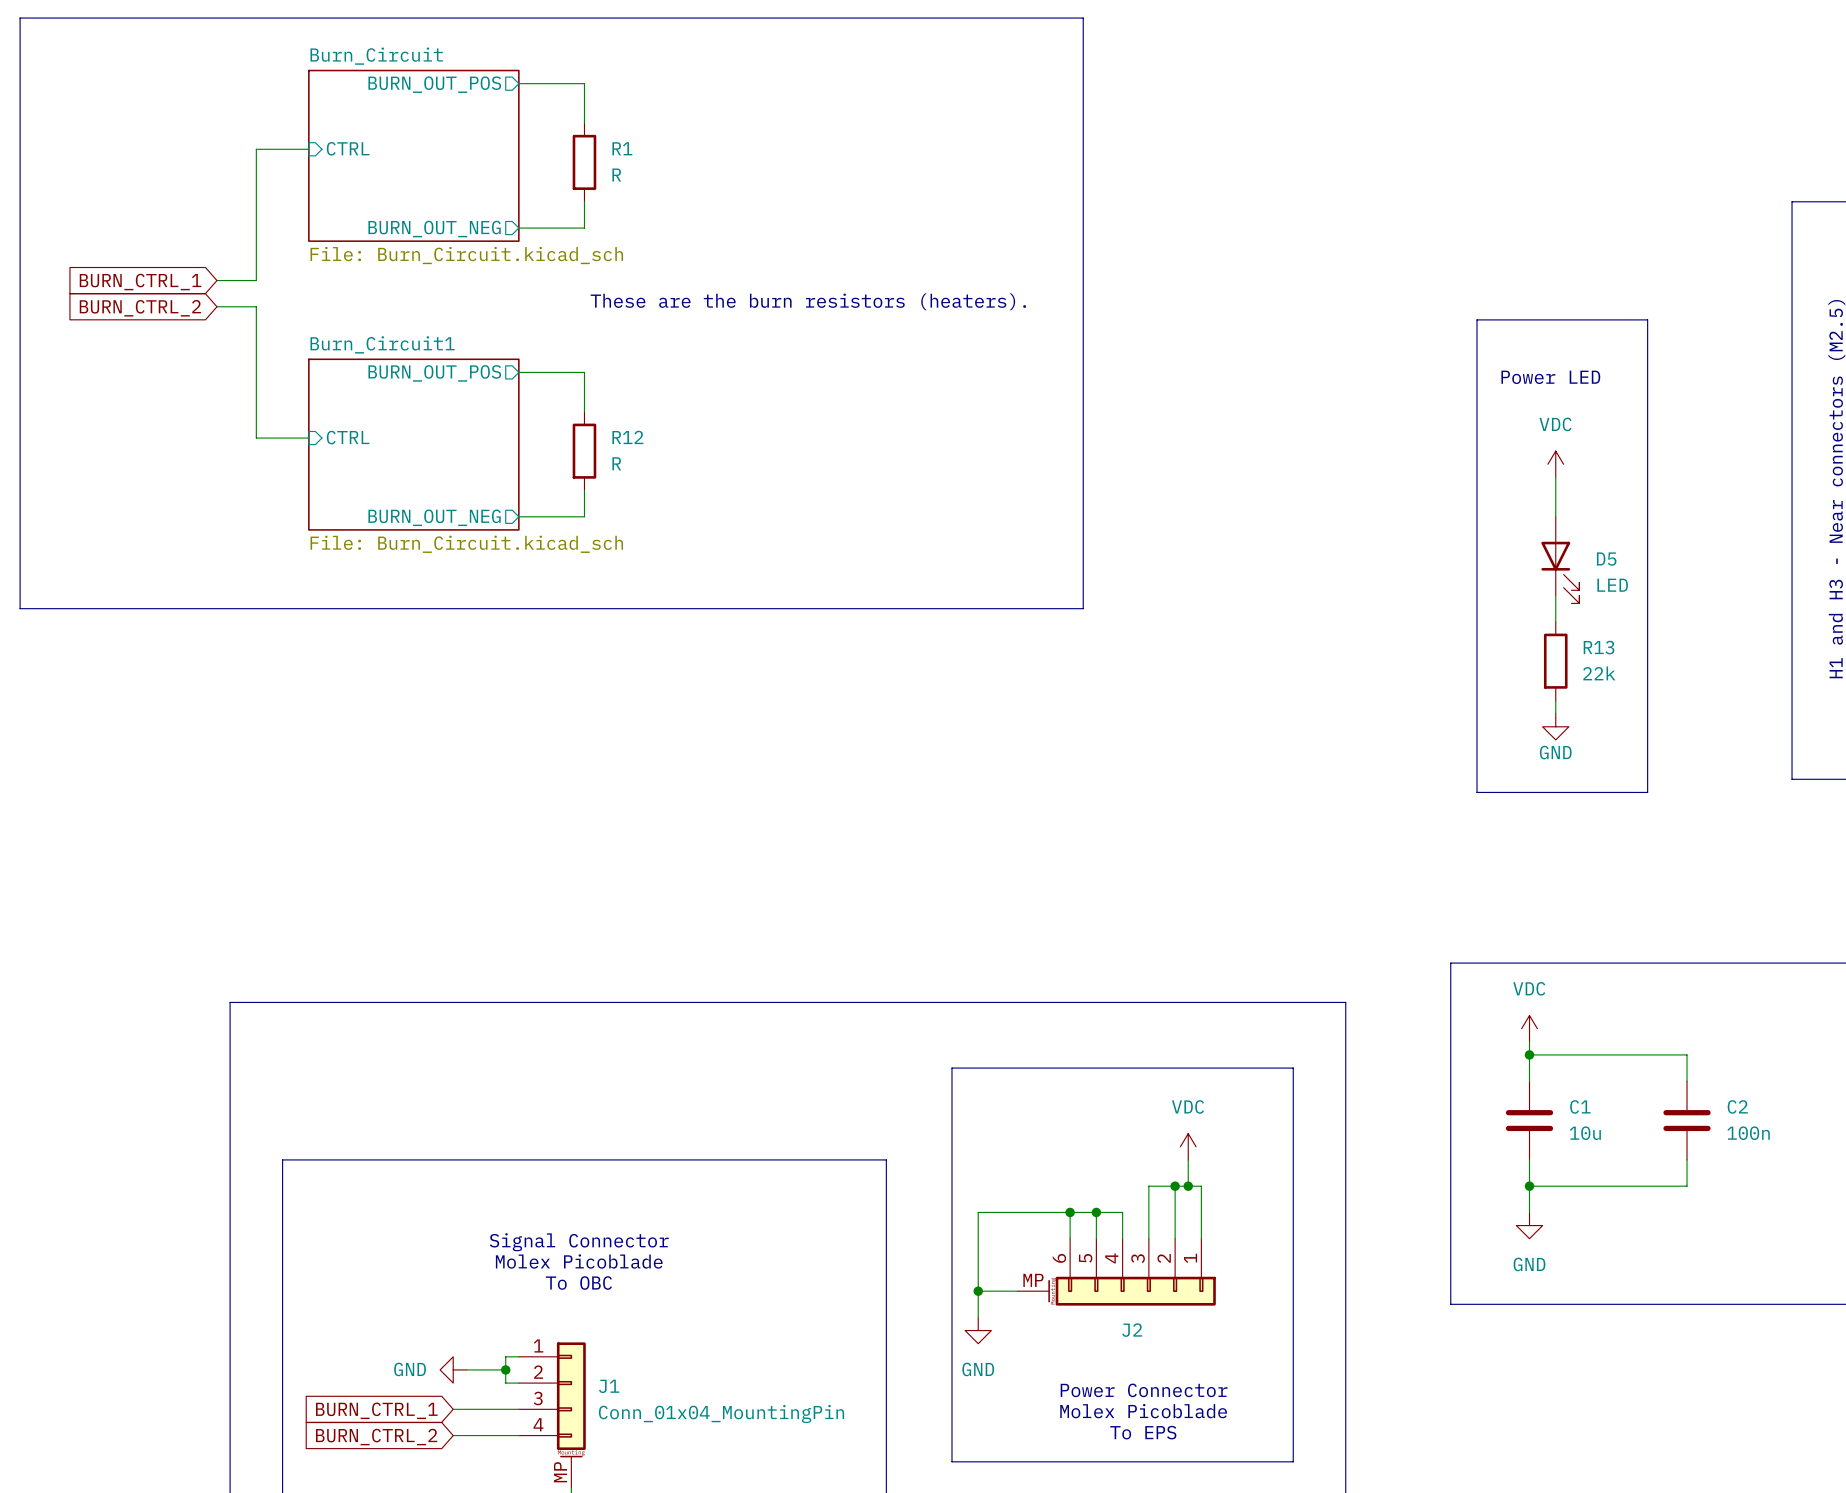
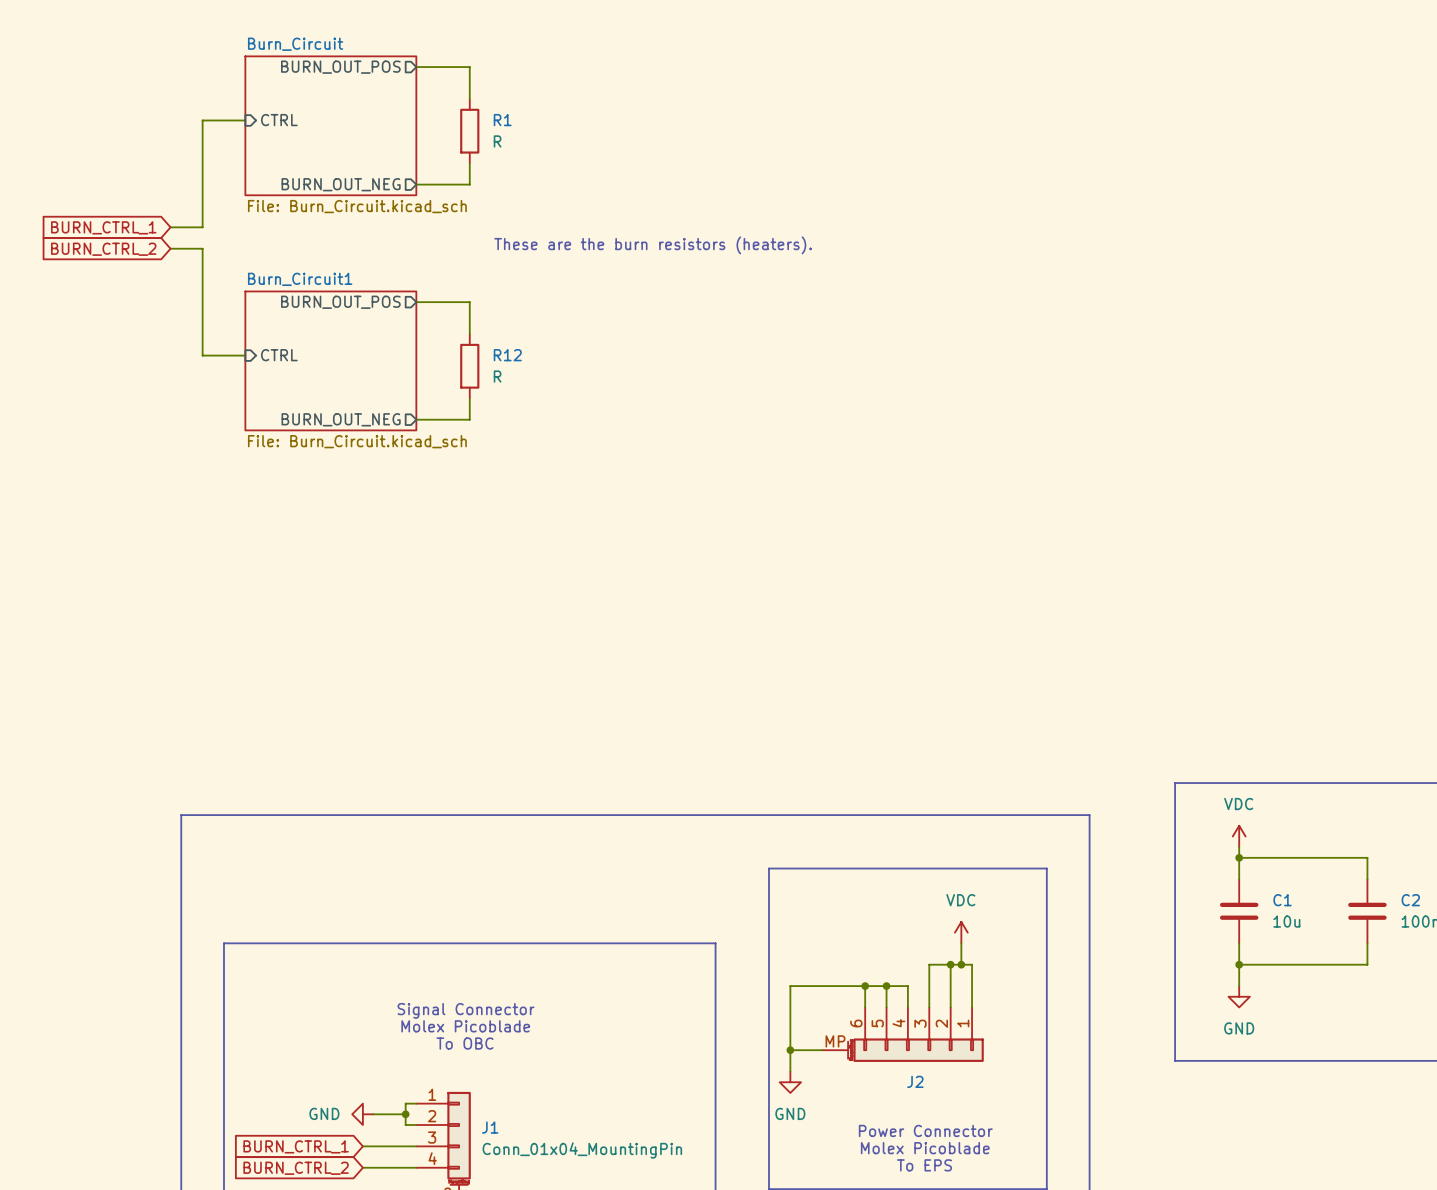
line: (20, 18) (1083, 18) (1083, 608) (20, 608) (20, 18) -> none
line: (1477, 319) (1647, 319) (1647, 792) (1477, 792) (1477, 319) -> none
text: Power LED (1550, 377) -> none
power symbol: VDC (1555, 464) -> none
wire: (1555, 477) (1555, 516) -> none
D5: LED (1560, 560) -> none
wire: (1555, 595) (1555, 621) -> none
R13: 22k (1555, 661) -> none
wire: (1555, 700) (1555, 713) -> none
power symbol: GND (1555, 726) -> none

